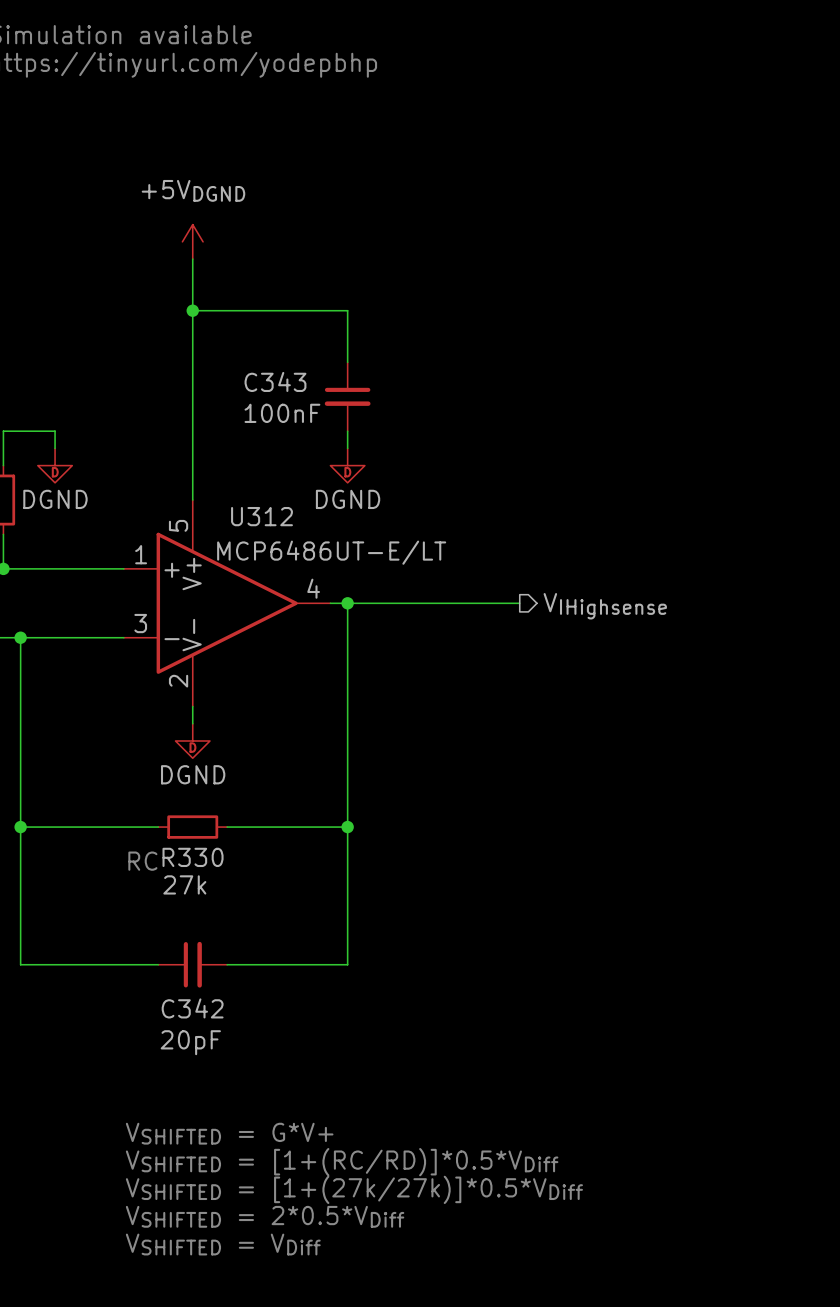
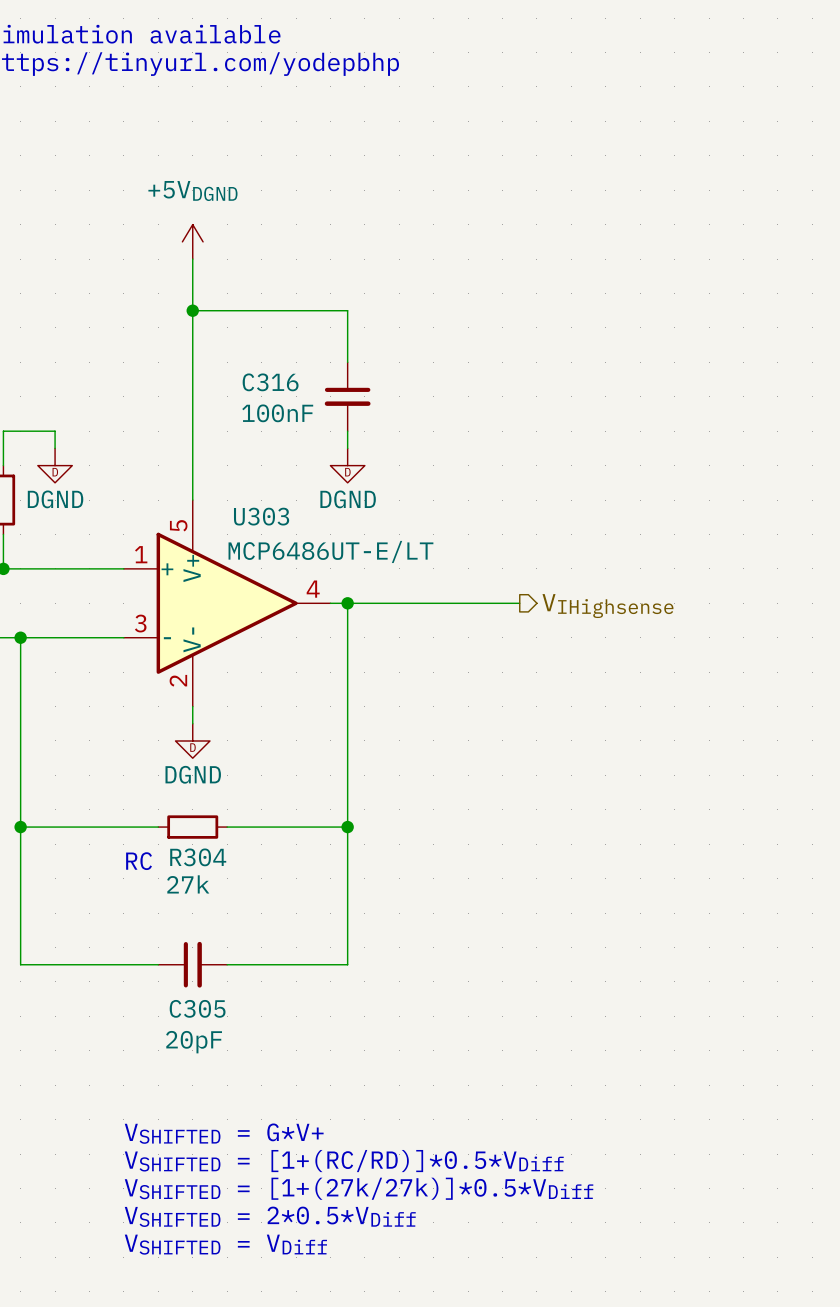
C343 name: C343 (275, 381) -> C316 (270, 382)
U312 name: U312 (262, 516) -> U303 (261, 516)
R330 name: R330 (193, 857) -> R304 (198, 857)
C342 name: C342 (192, 1008) -> C305 (197, 1008)

